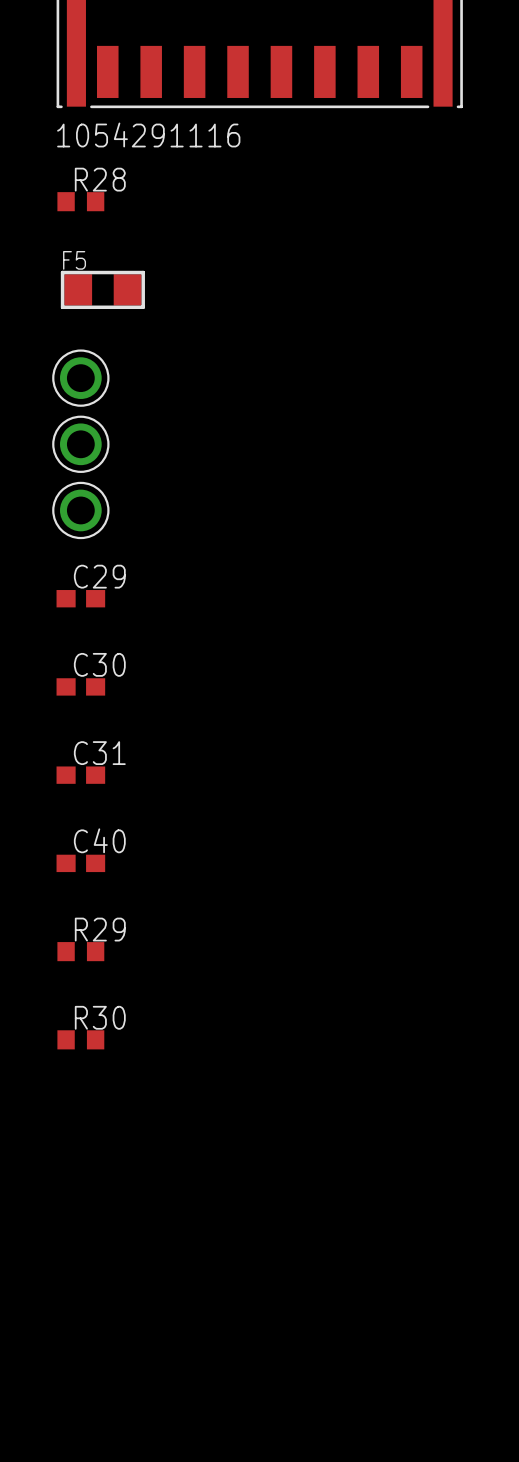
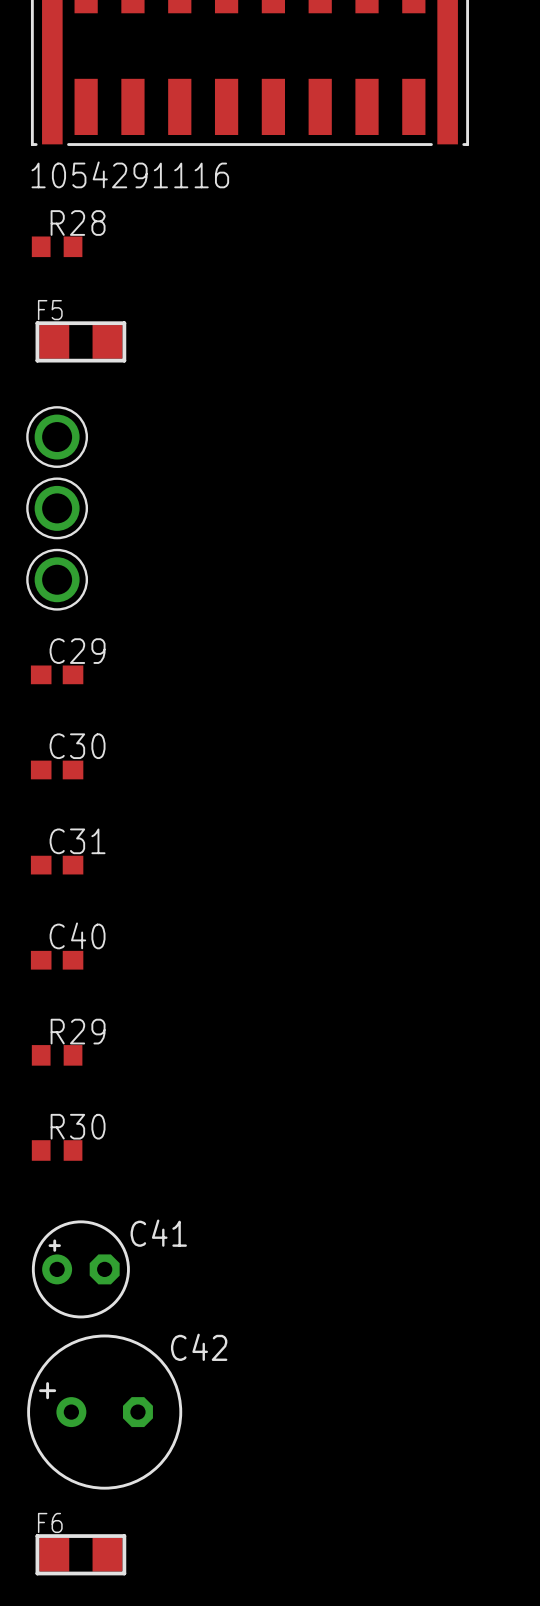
C41: none -> (80, 1269)
C42: none -> (104, 1412)
F6: none -> (80, 1554)

